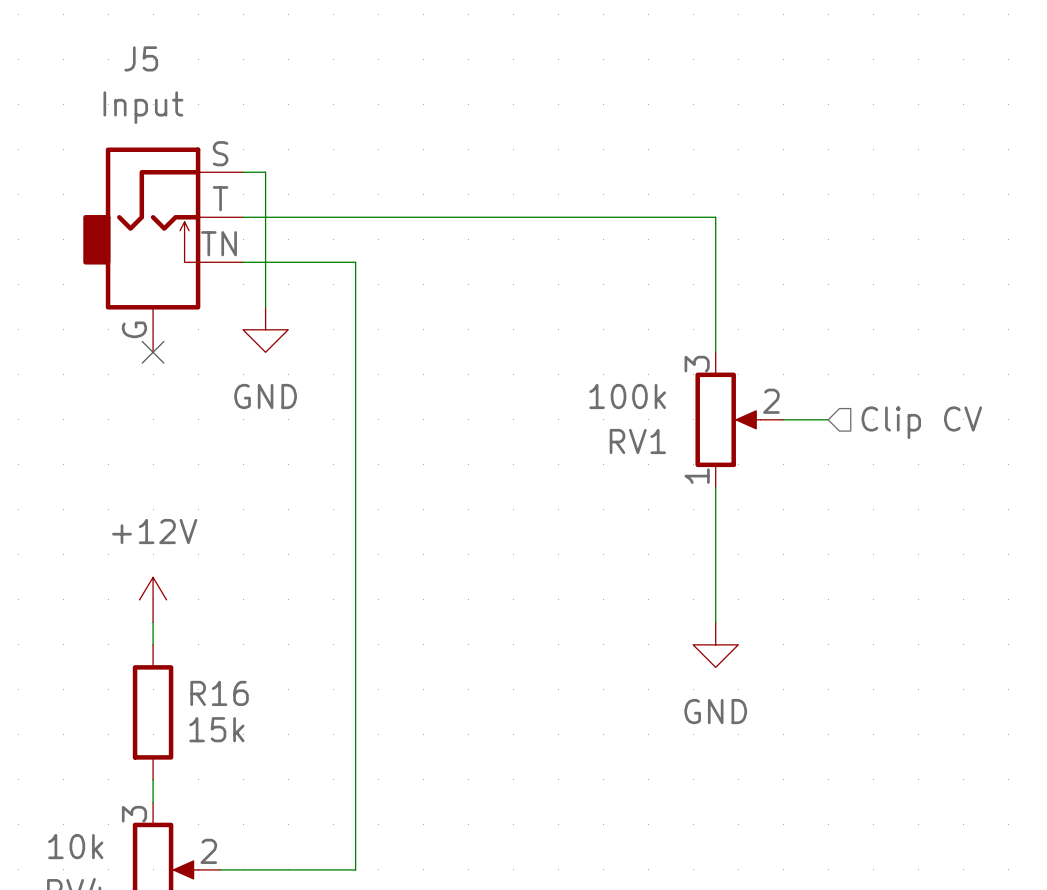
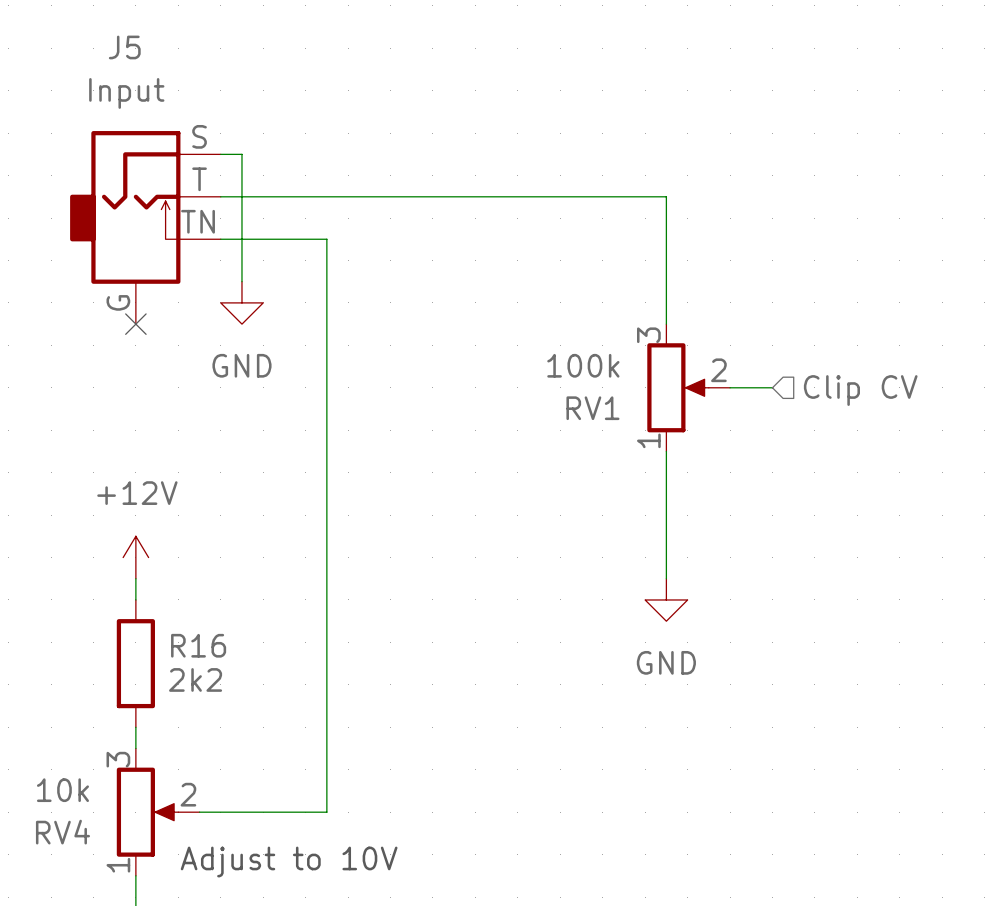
R16 value: 15k (216, 729) -> 2k2 (195, 679)

